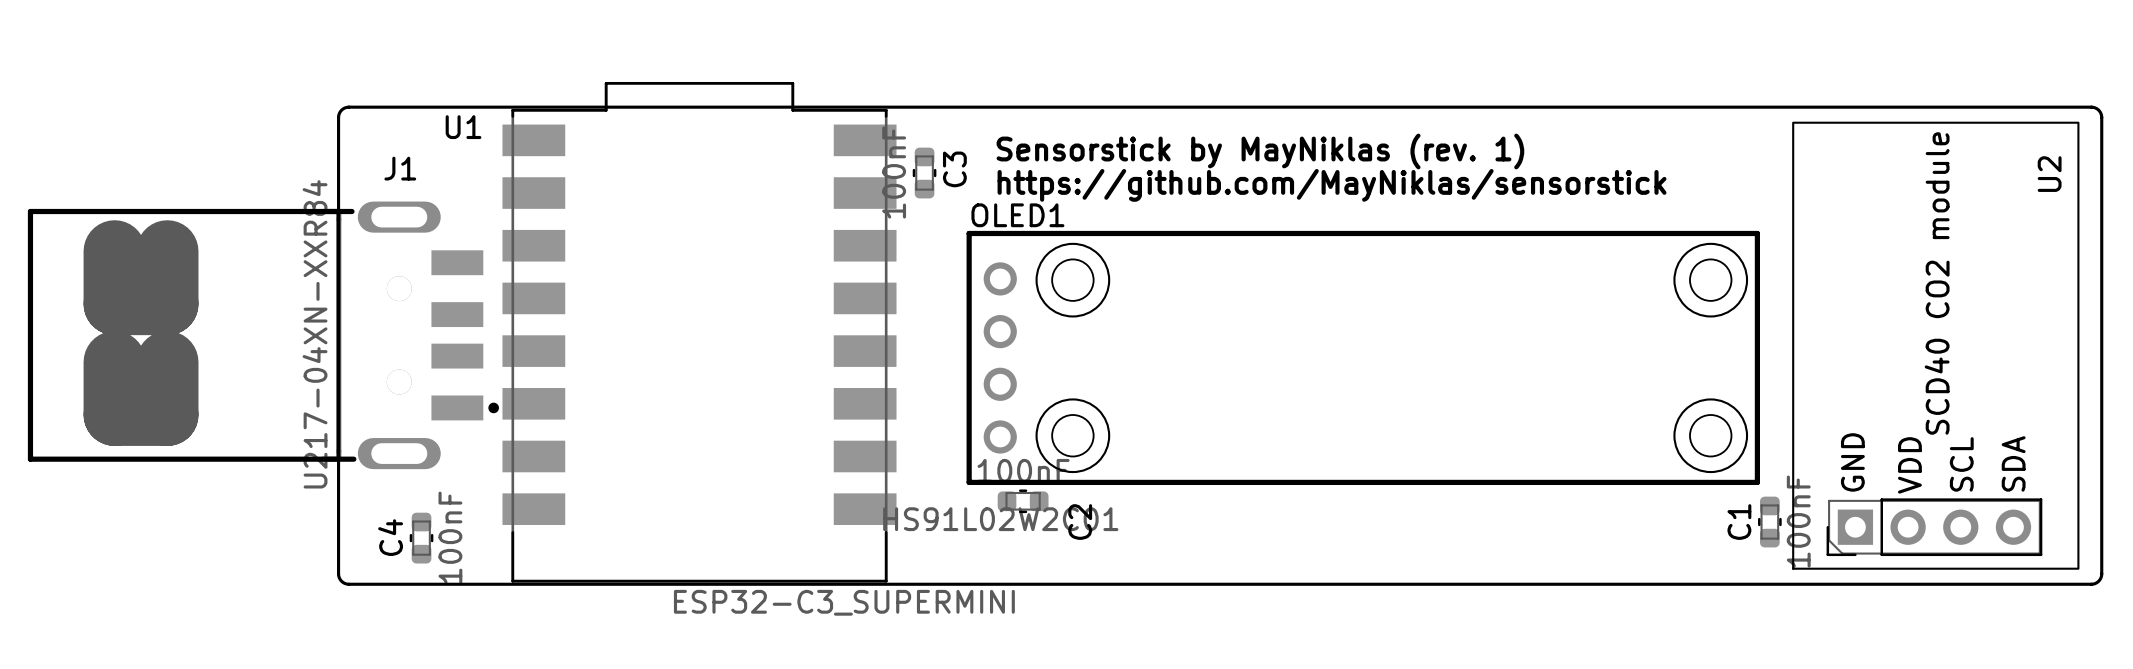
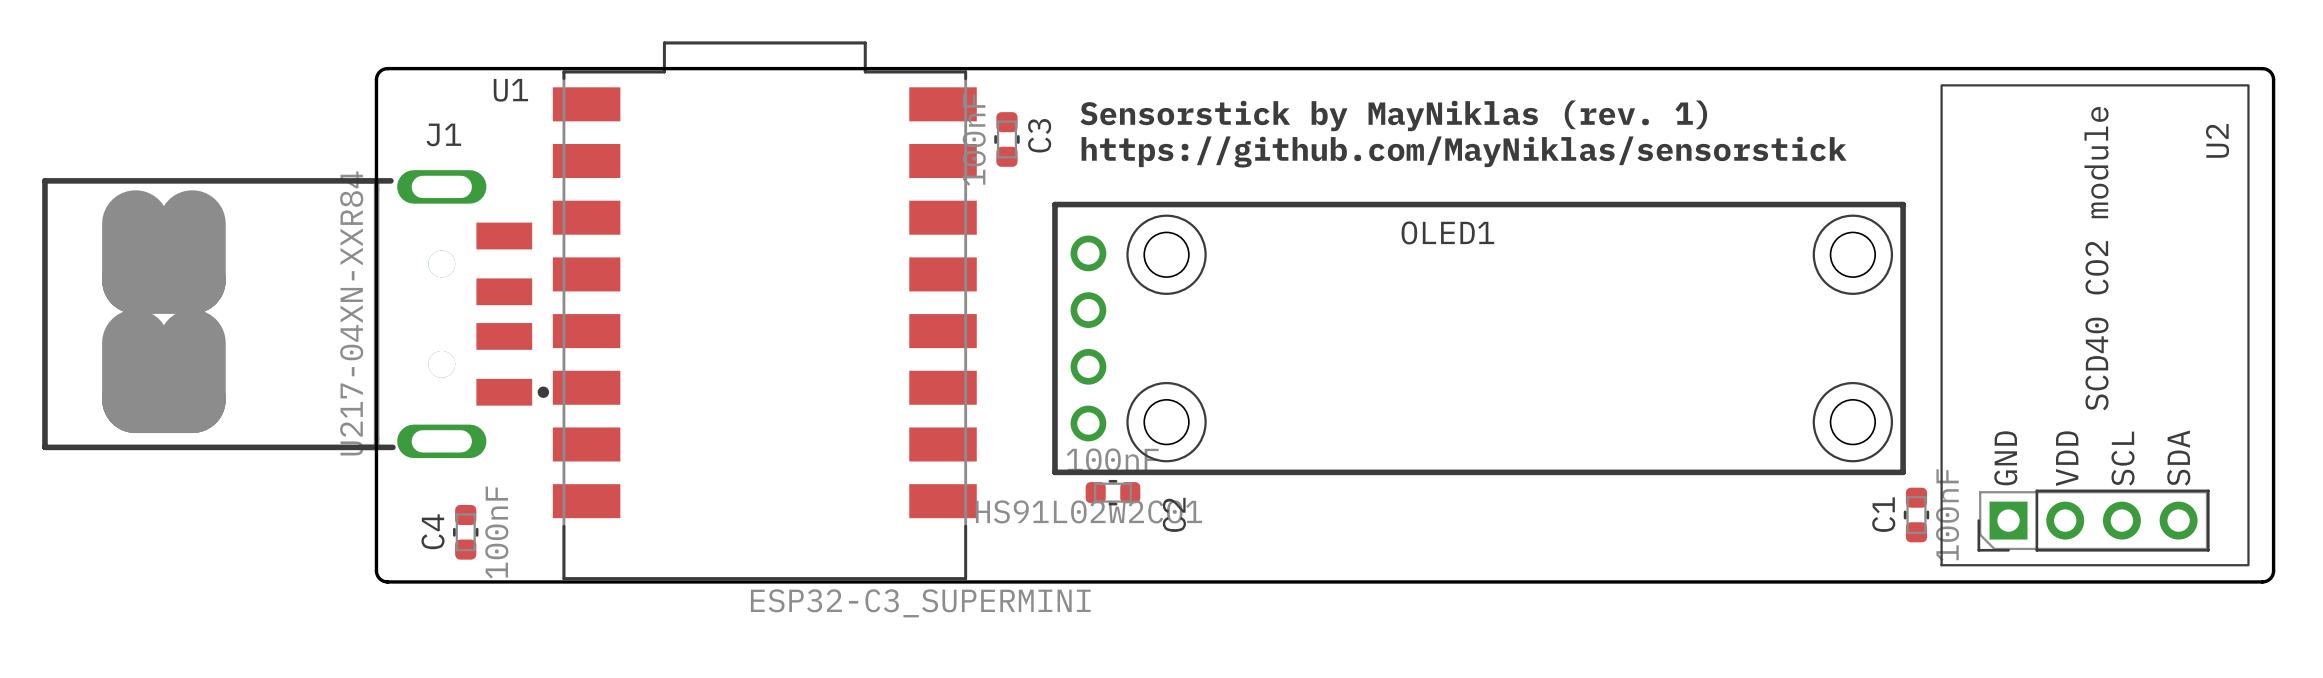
OLED1 name position: OLED1 (1017, 215) -> OLED1 (1447, 232)

